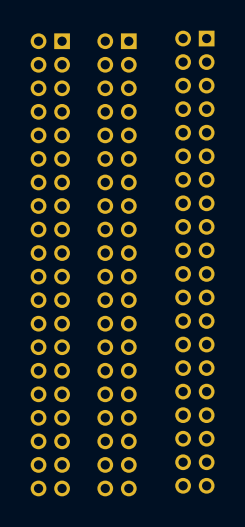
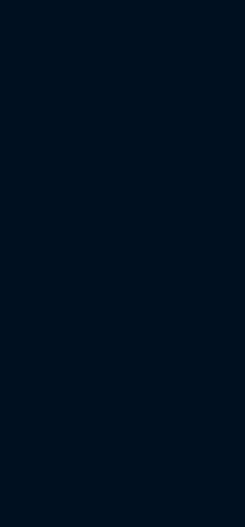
part: (194, 262) -> none
part: (50, 264) -> none
part: (117, 264) -> none

